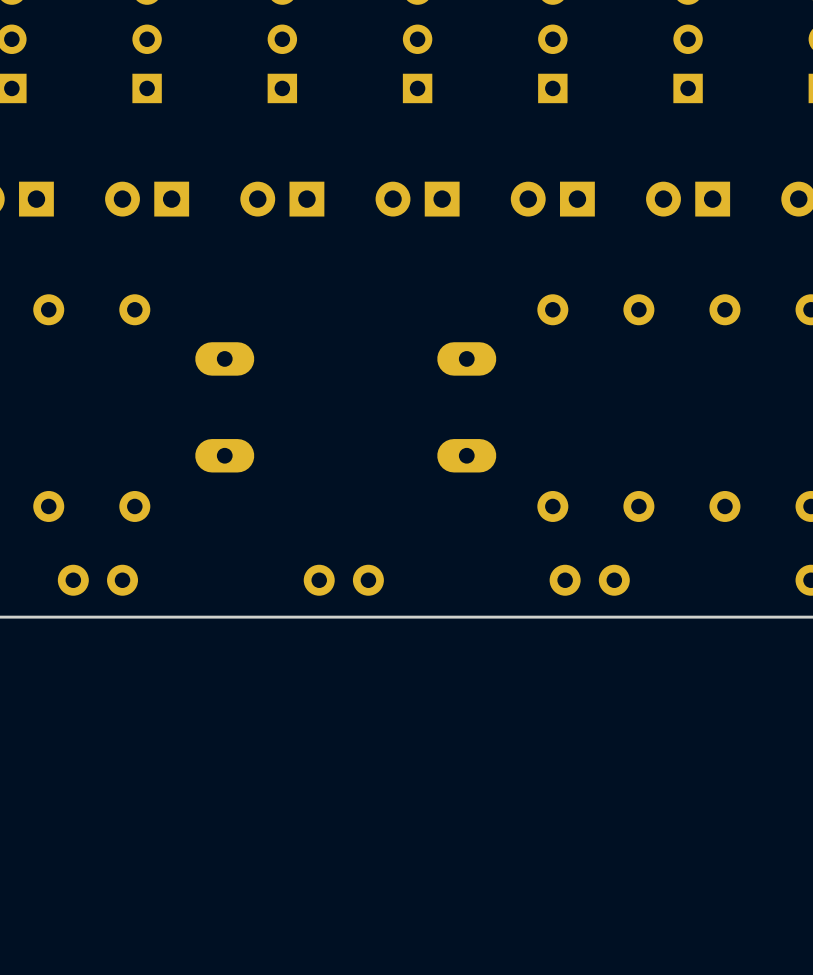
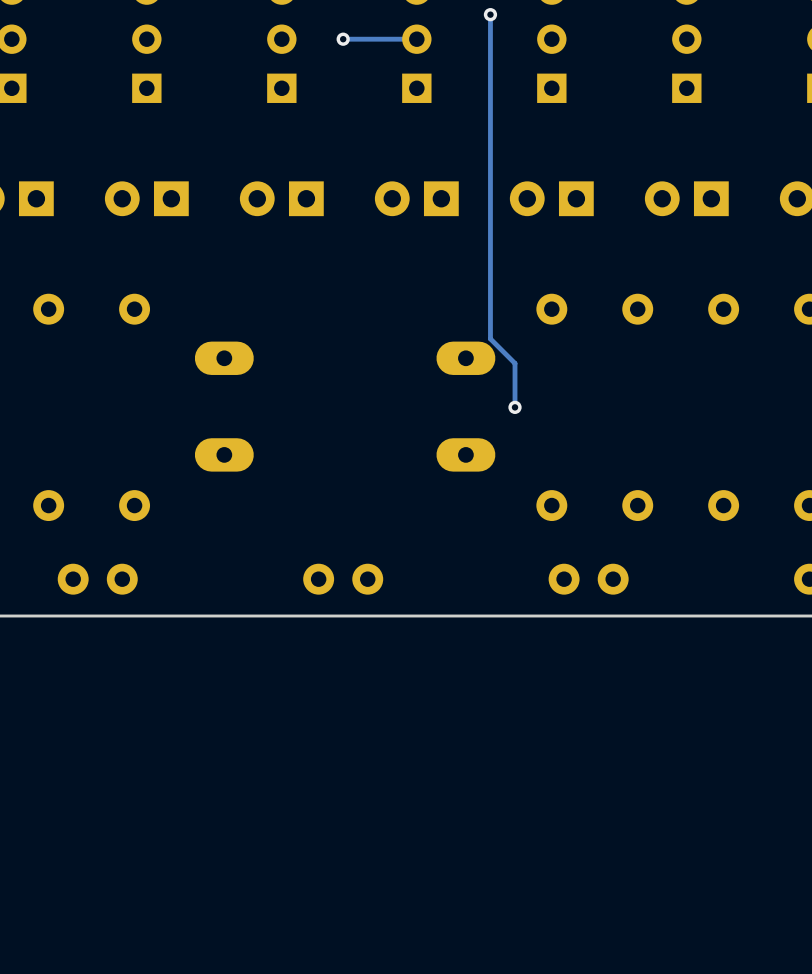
track: none -> (490, 14) (490, 338) (515, 363) (515, 407)
via: none -> (490, 14)
via: none -> (343, 39)
track: none -> (416, 39) (343, 39)
via: none -> (515, 407)

